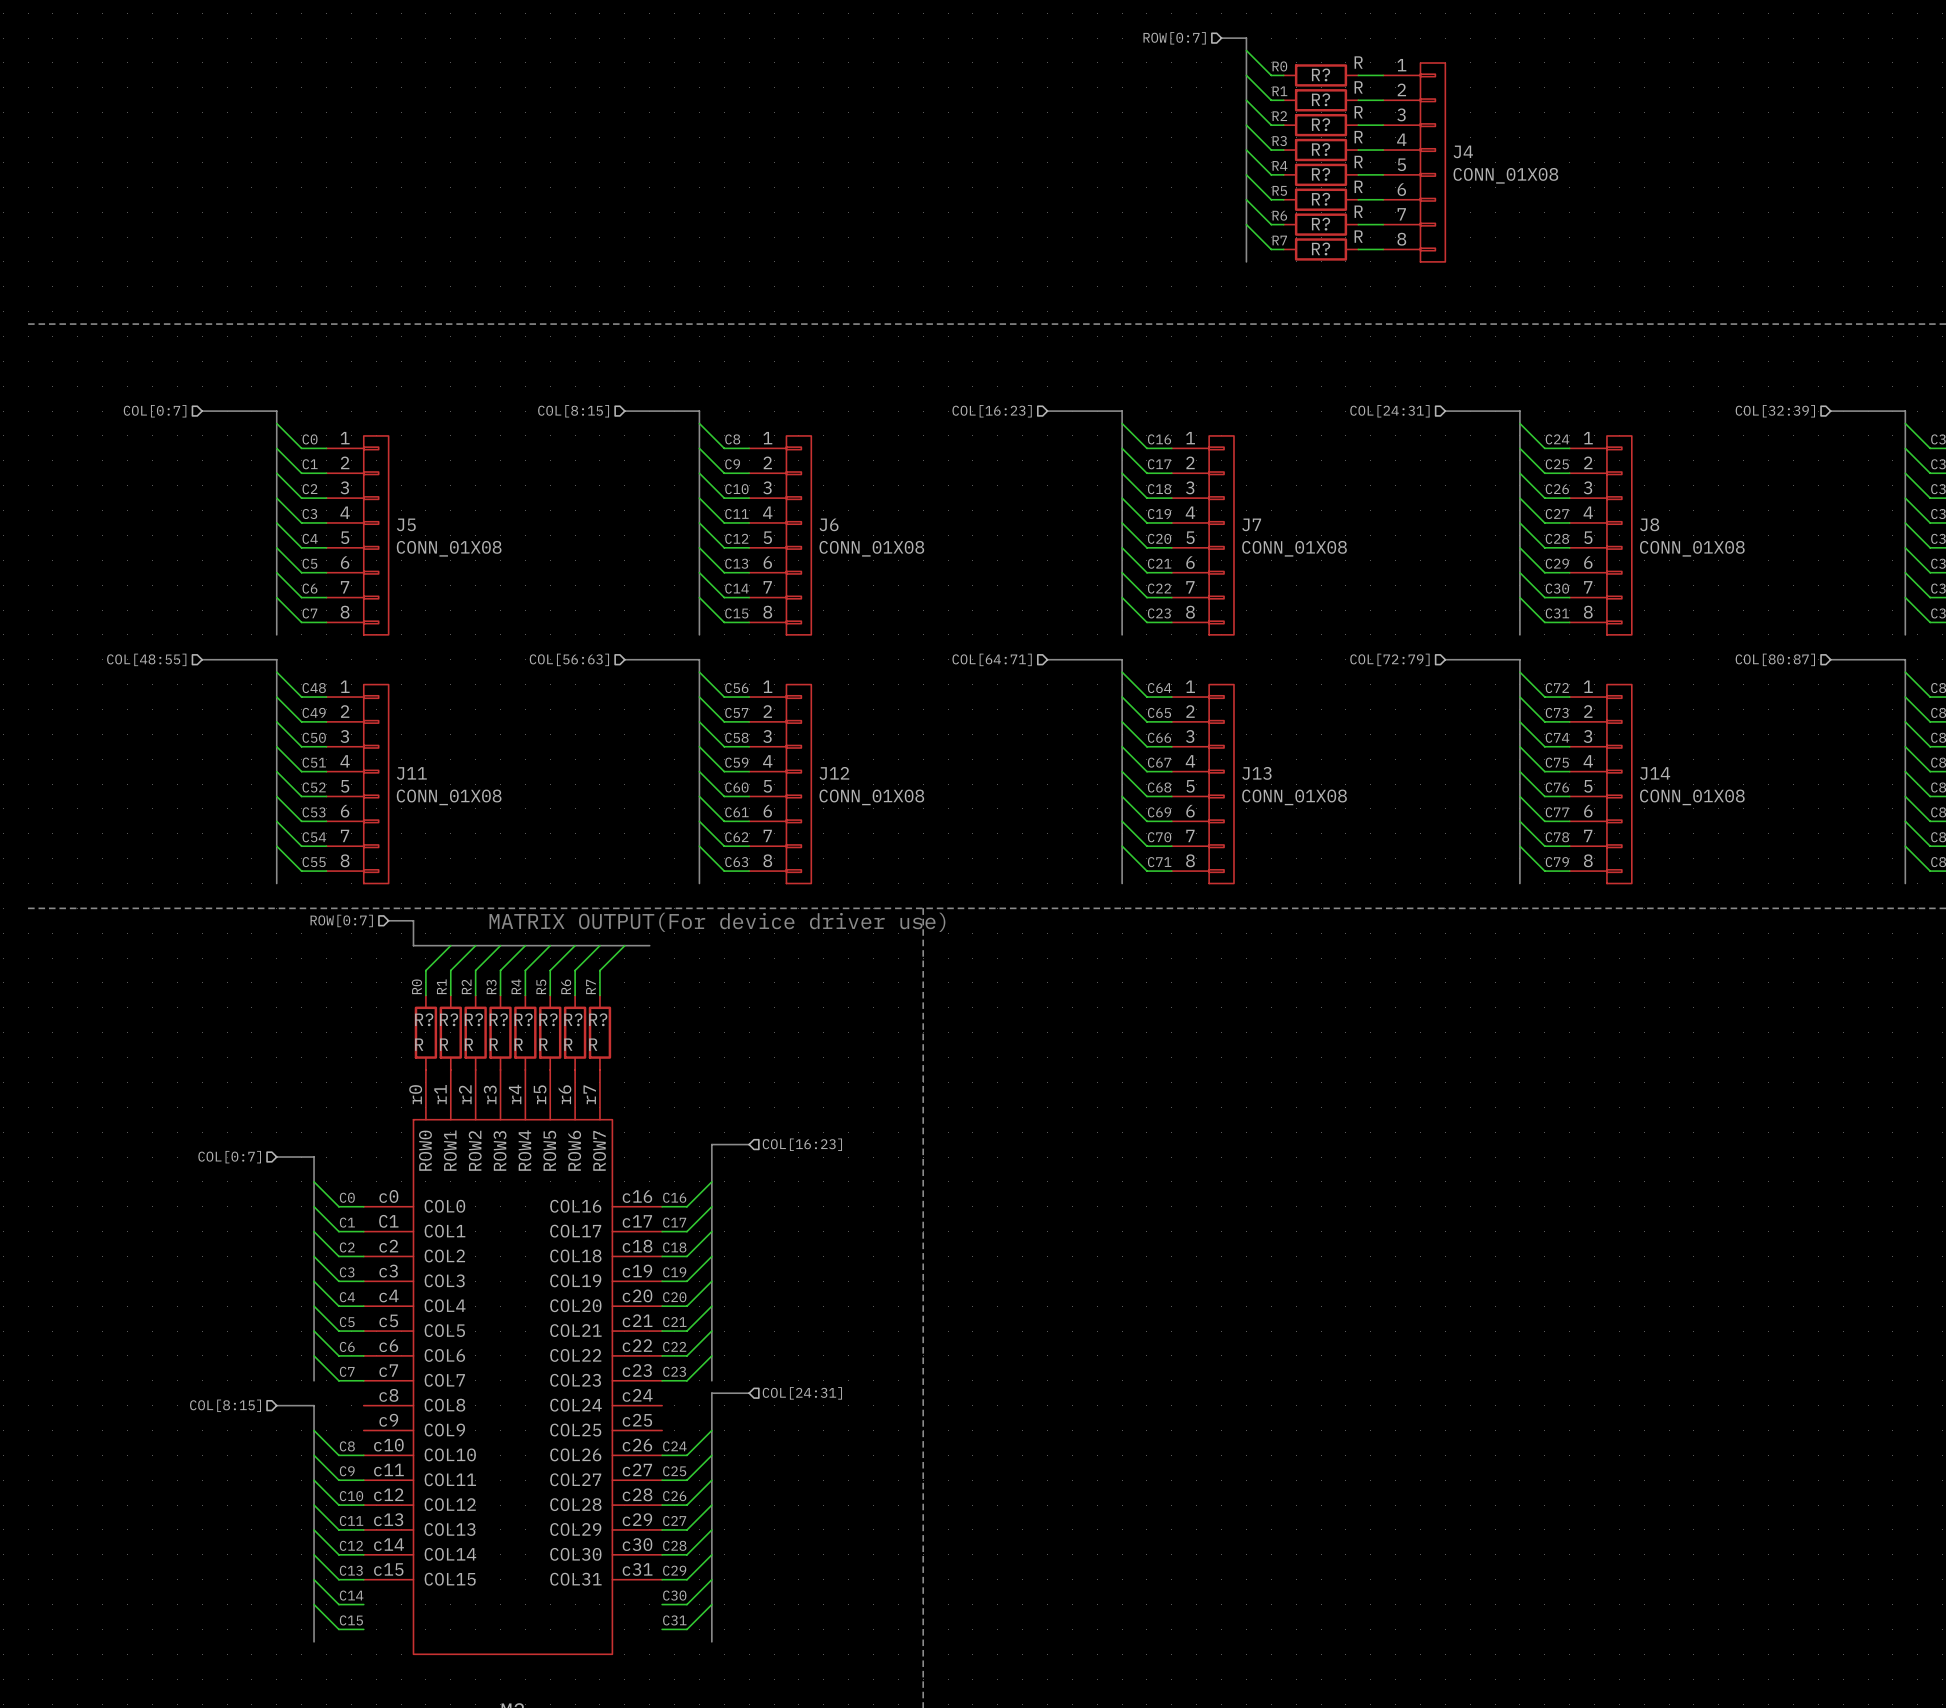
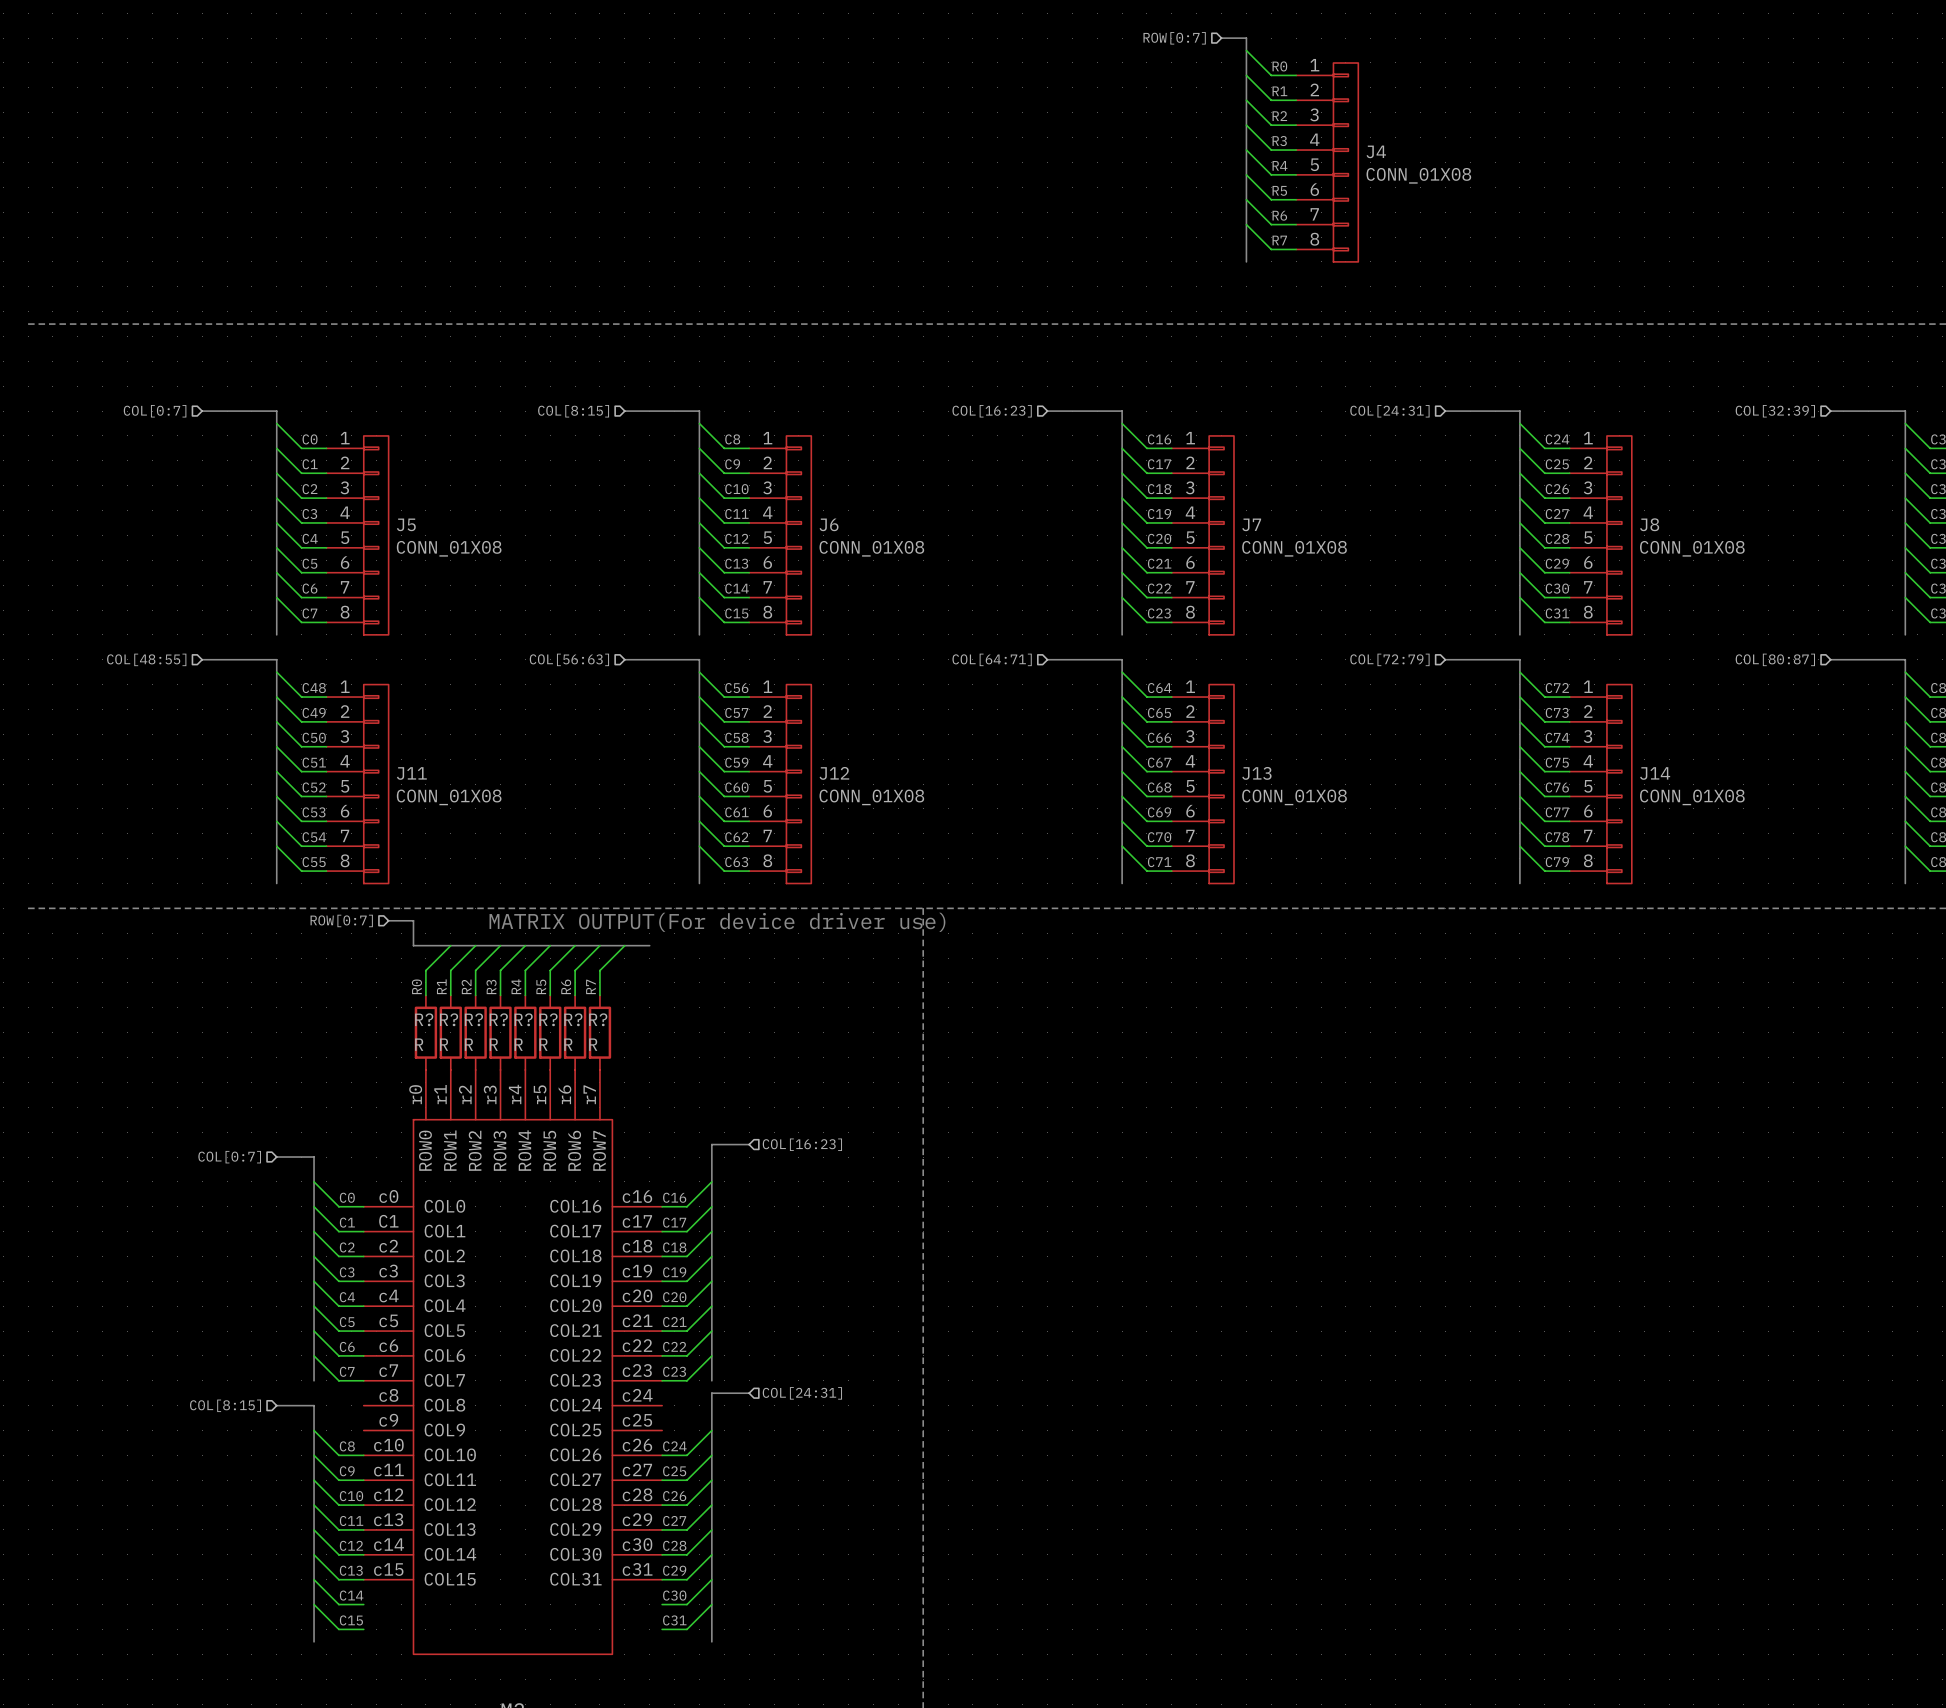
R?: R (1321, 75) -> none
wire: (1358, 75) (1383, 75) -> none
R?: R (1321, 100) -> none
wire: (1358, 100) (1383, 100) -> none
R?: R (1321, 125) -> none
wire: (1358, 125) (1383, 125) -> none
R?: R (1321, 150) -> none
wire: (1358, 150) (1383, 150) -> none
J4 position: (1414, 162) -> (1327, 162)
R?: R (1321, 174) -> none
wire: (1358, 174) (1383, 174) -> none
R?: R (1321, 199) -> none
wire: (1358, 199) (1383, 199) -> none
R?: R (1321, 224) -> none
wire: (1358, 224) (1383, 224) -> none
R?: R (1321, 249) -> none
wire: (1358, 249) (1383, 249) -> none

